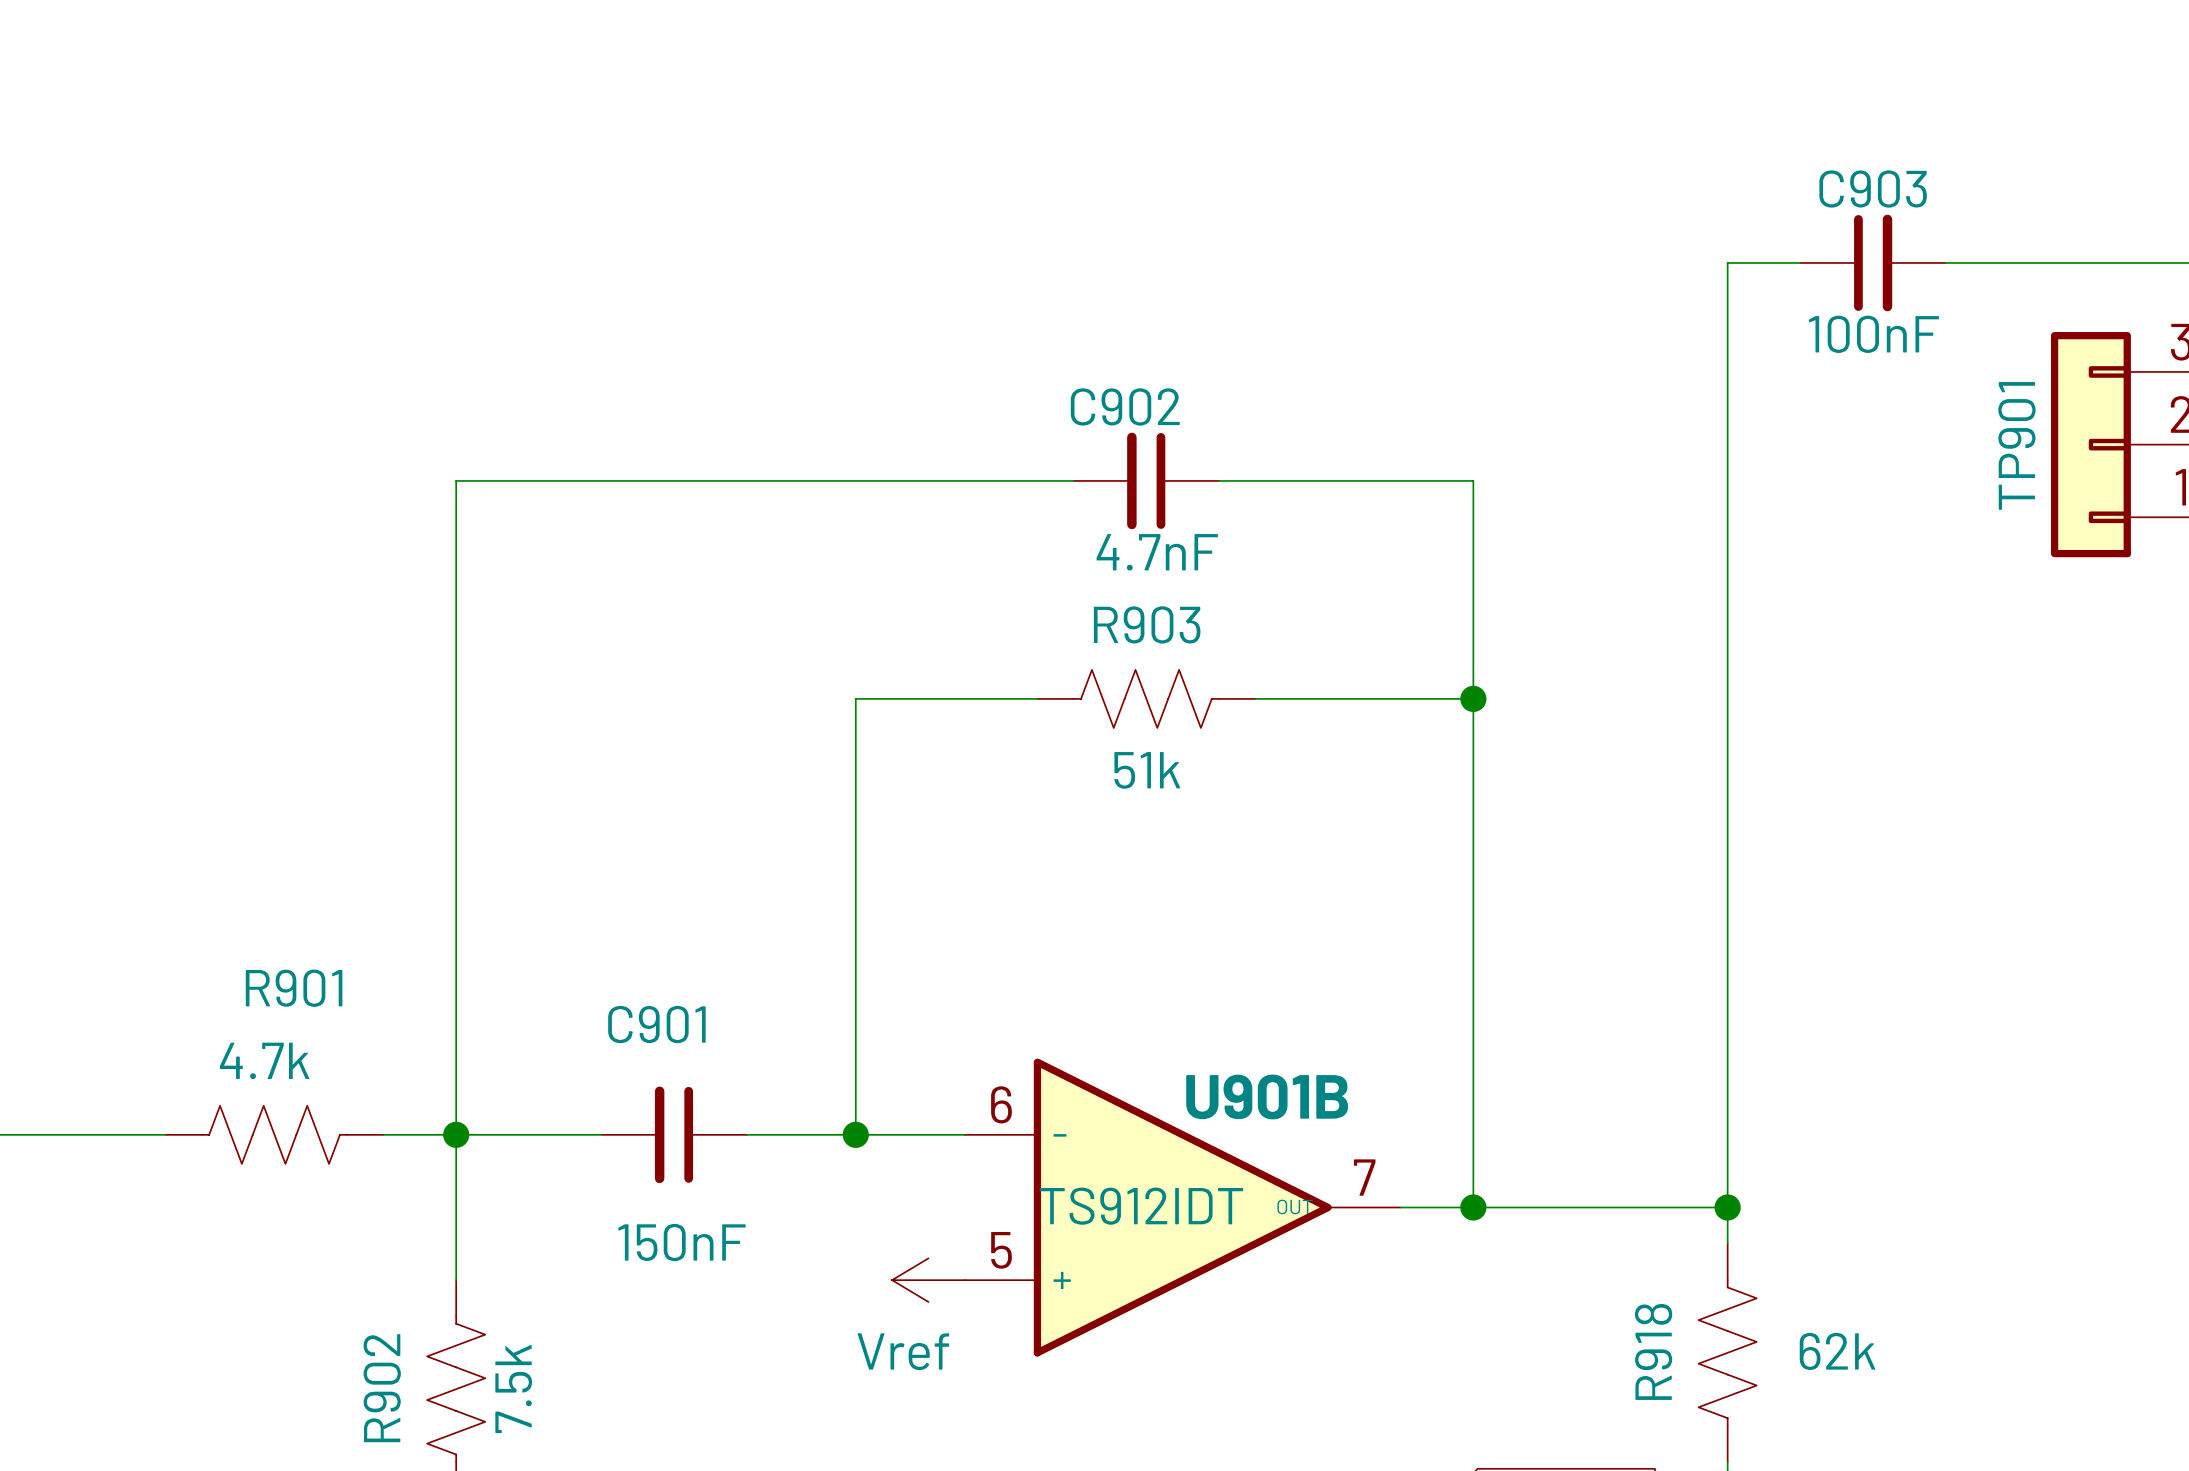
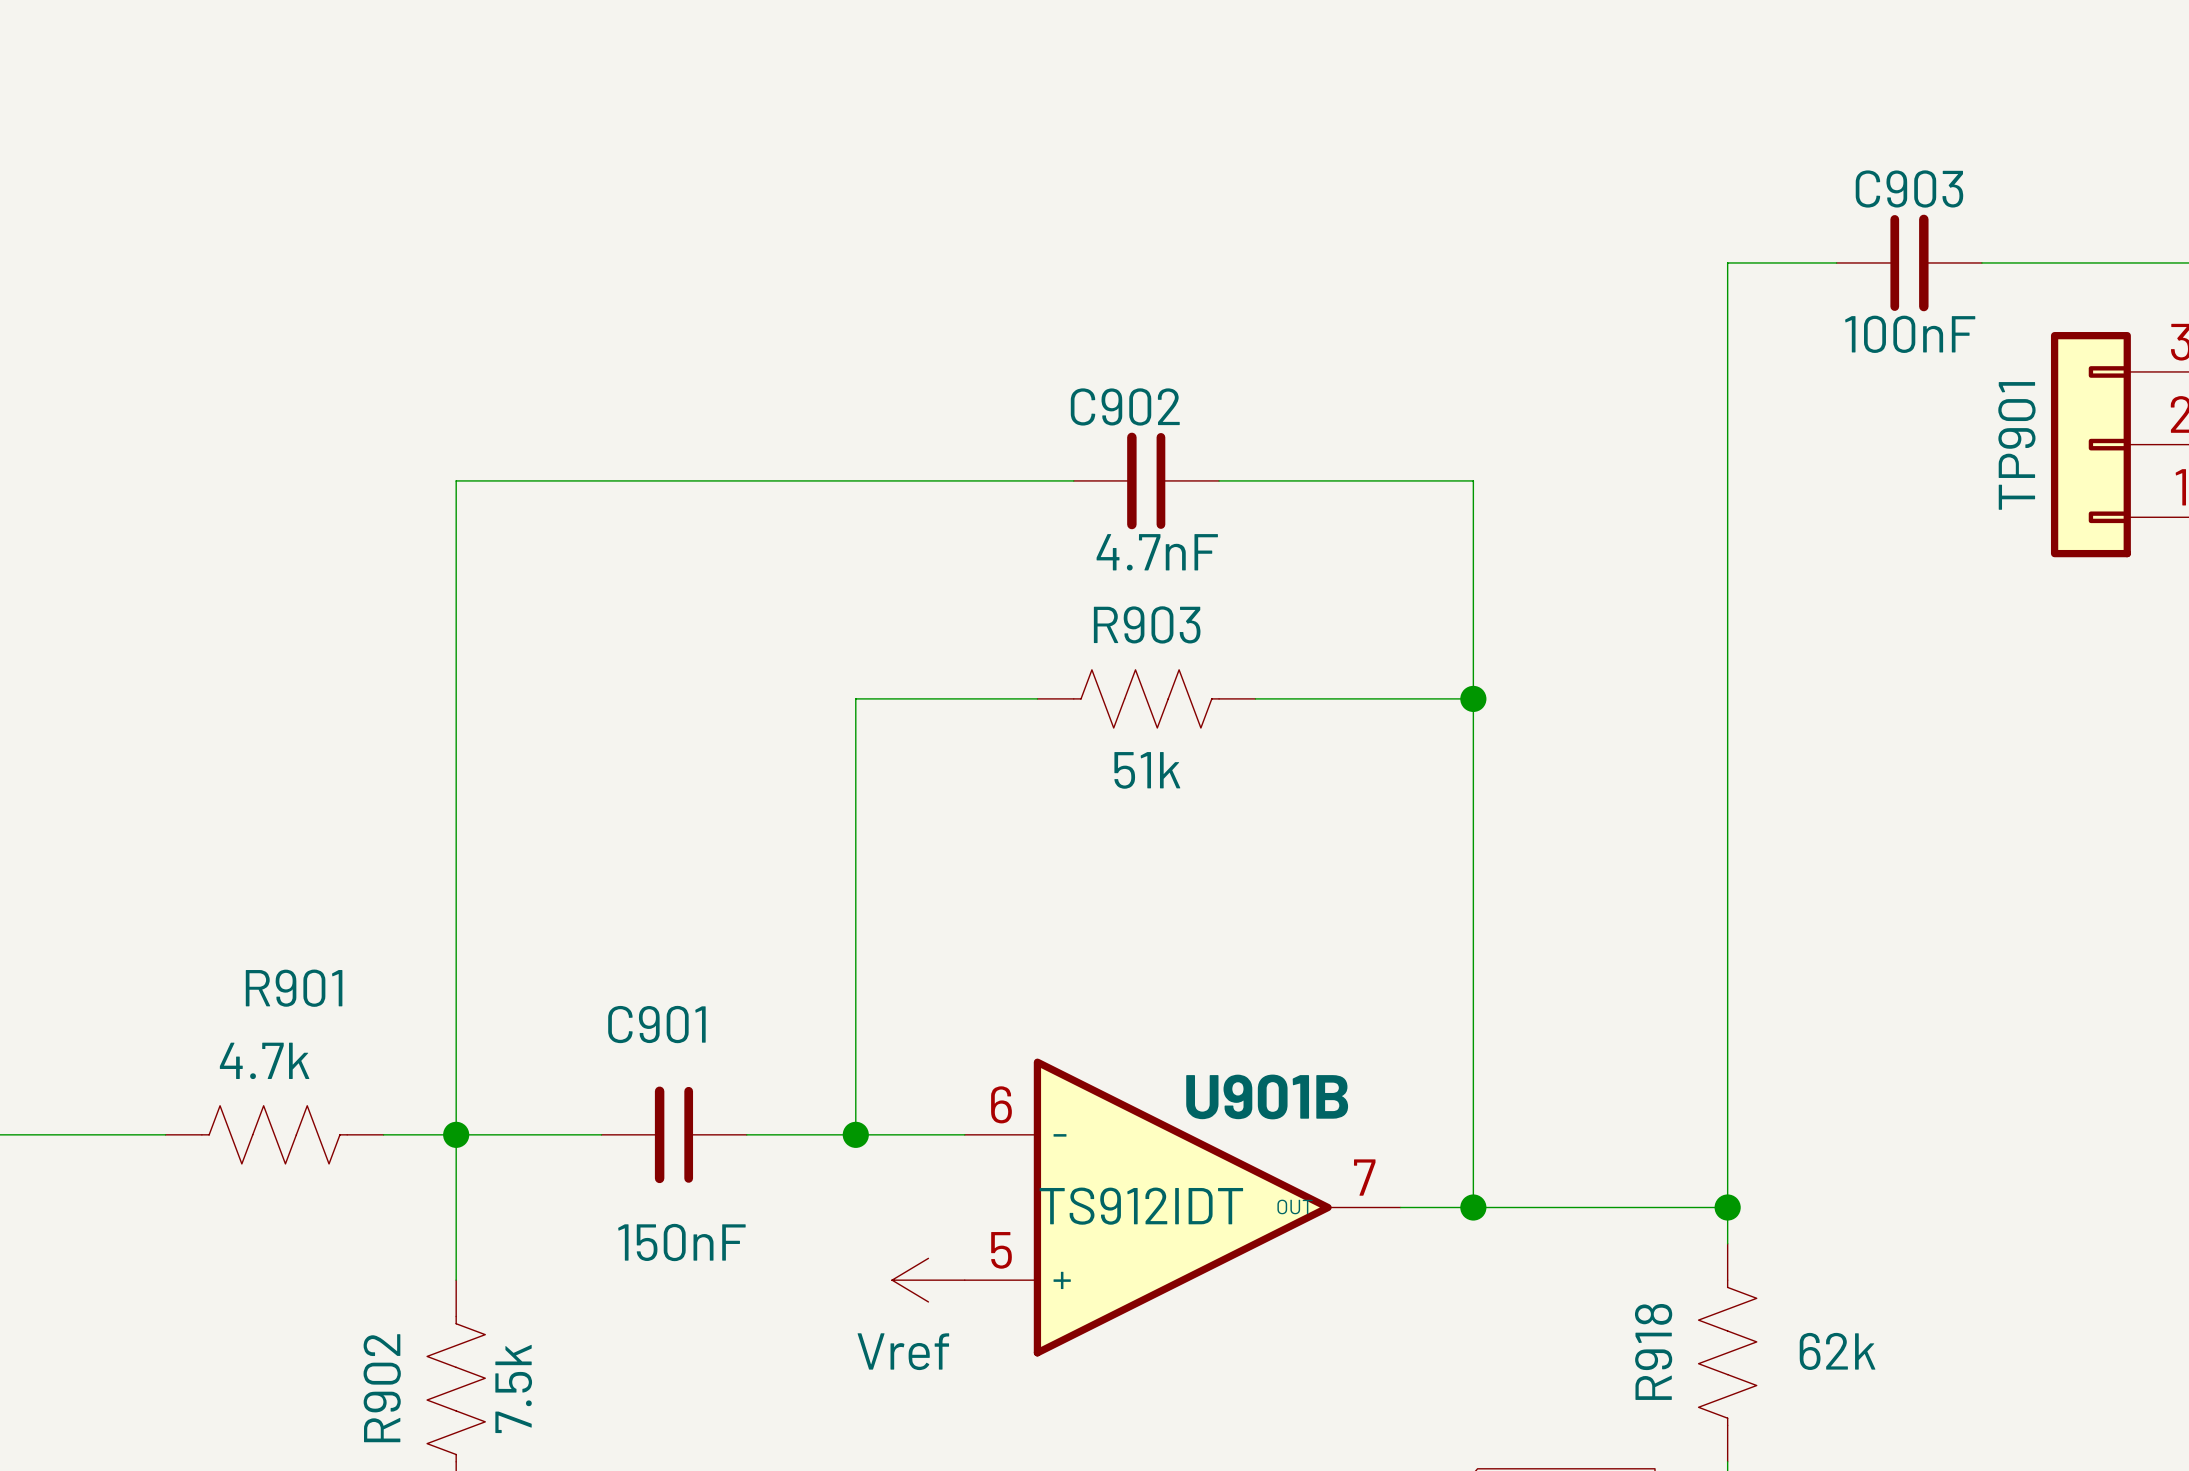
C903 position: (1872, 262) -> (1909, 262)

